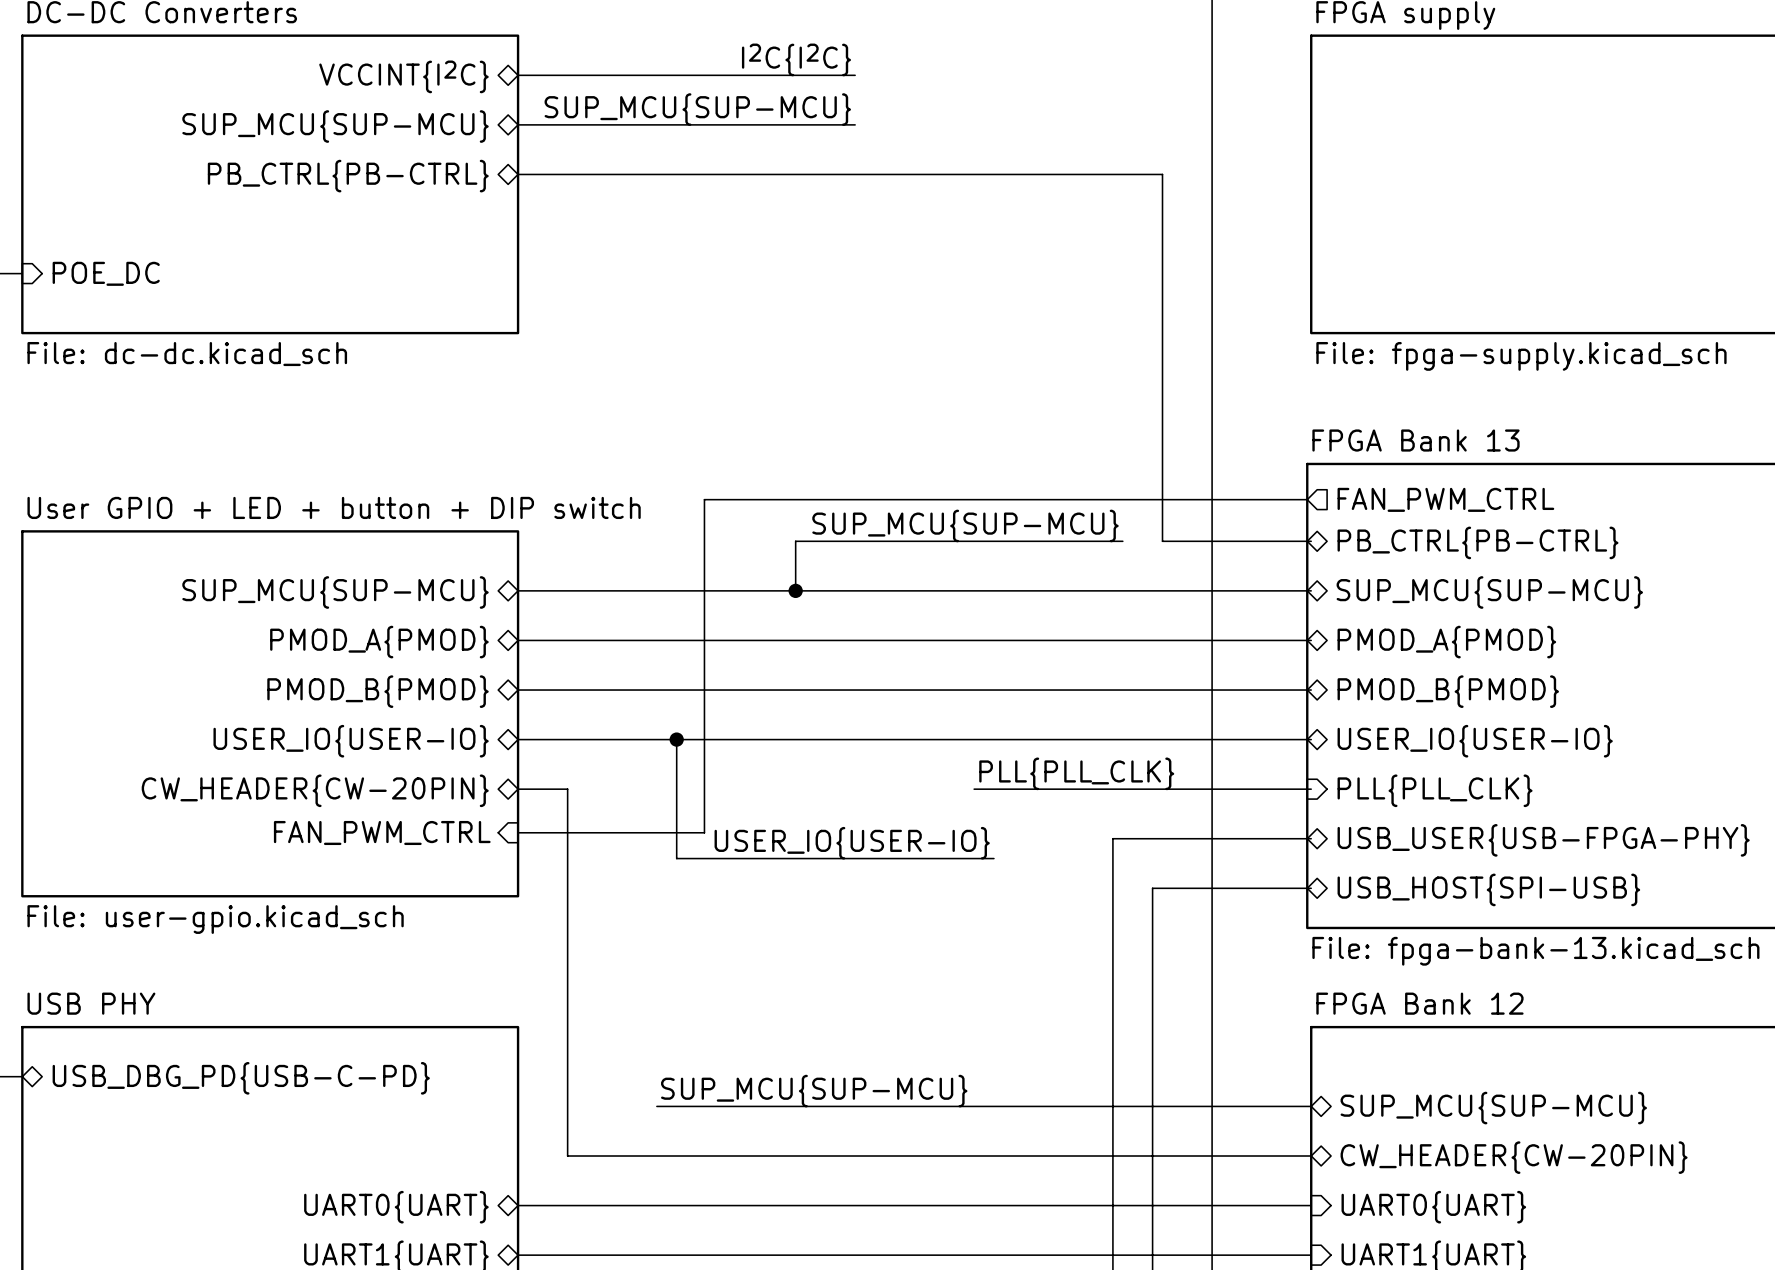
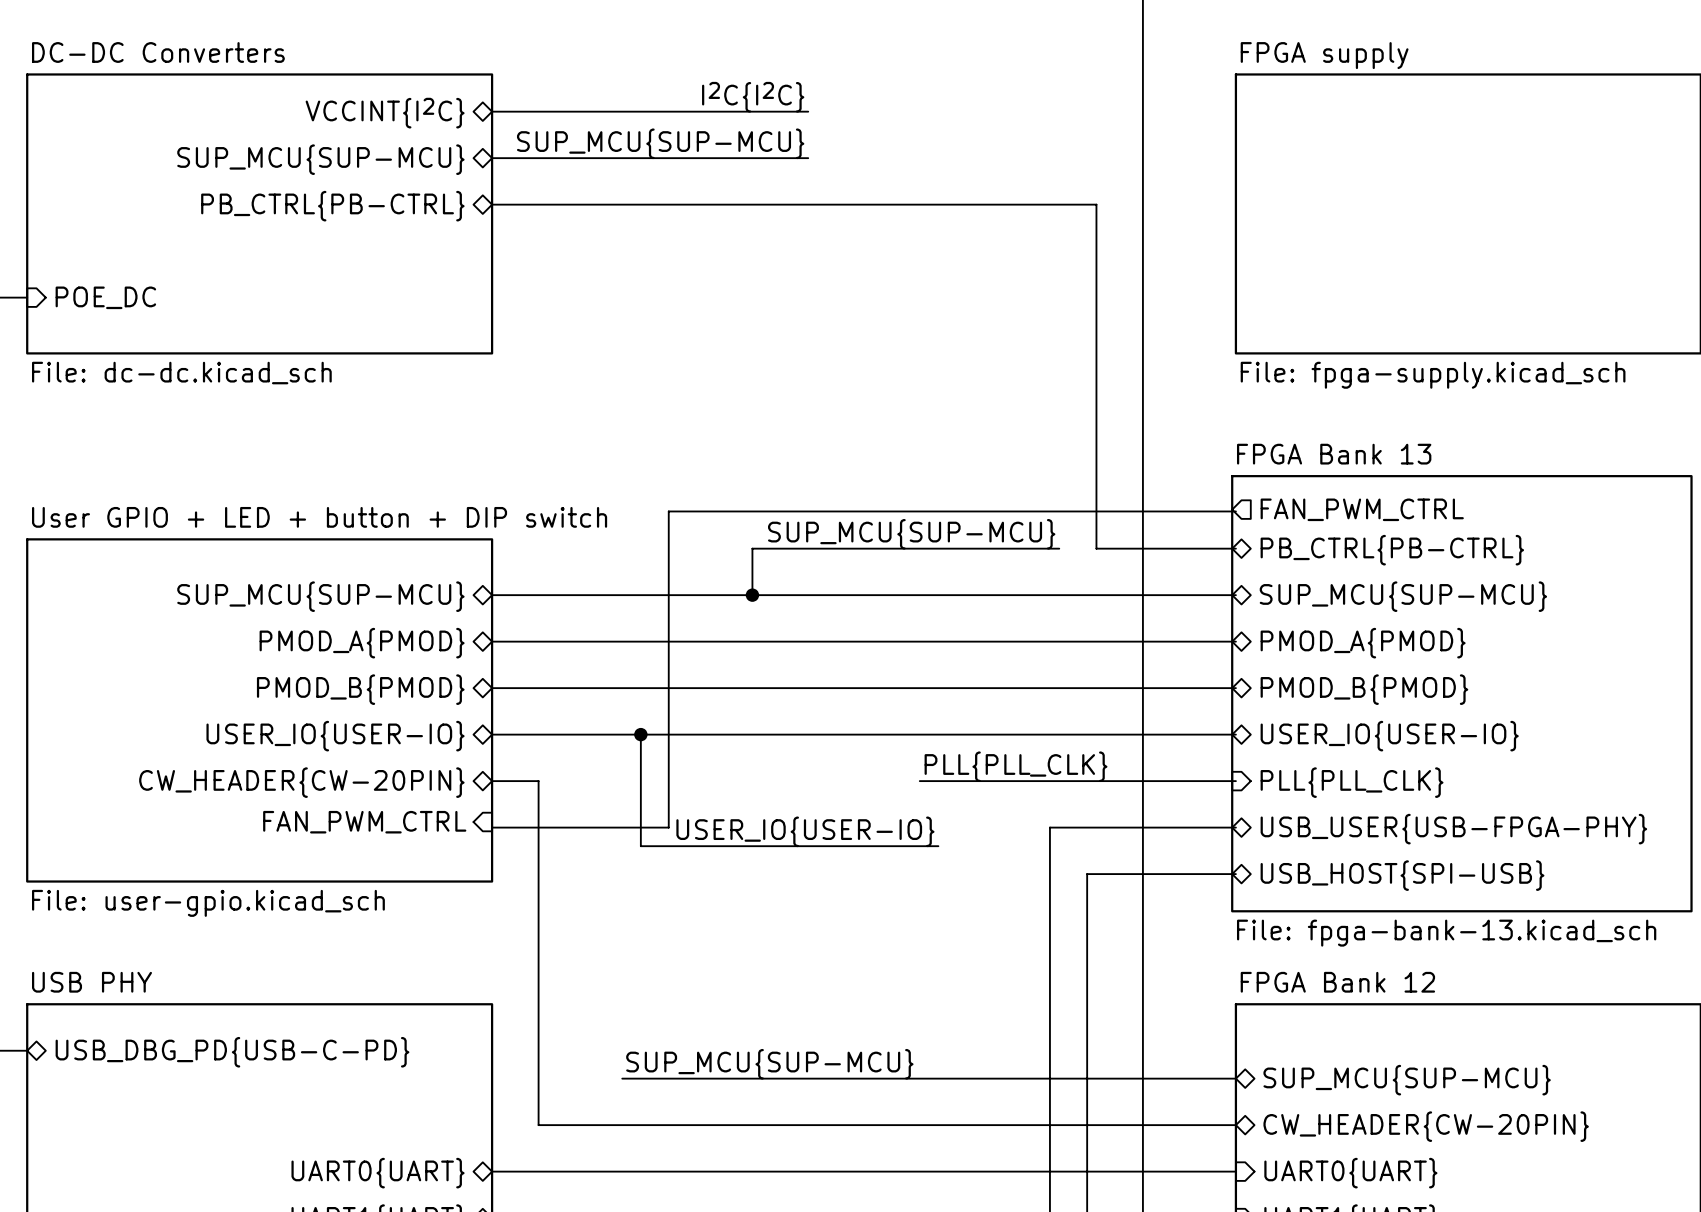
wire: (1307, 499) (704, 499) (704, 832) (518, 832) -> none
wire: none -> (1235, 511) (668, 511) (668, 827) (492, 827)

